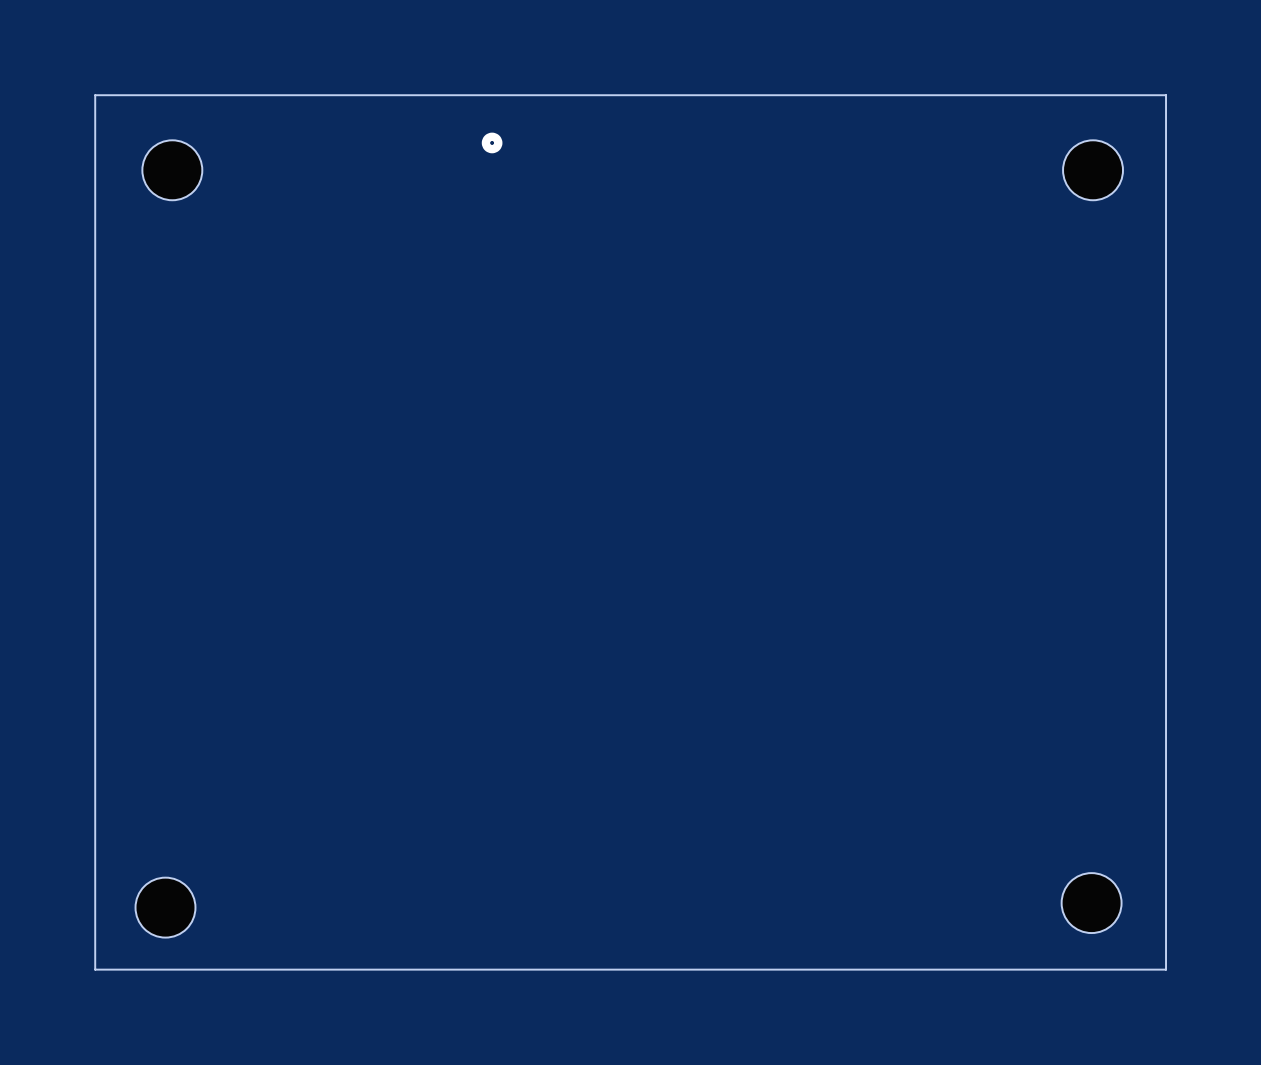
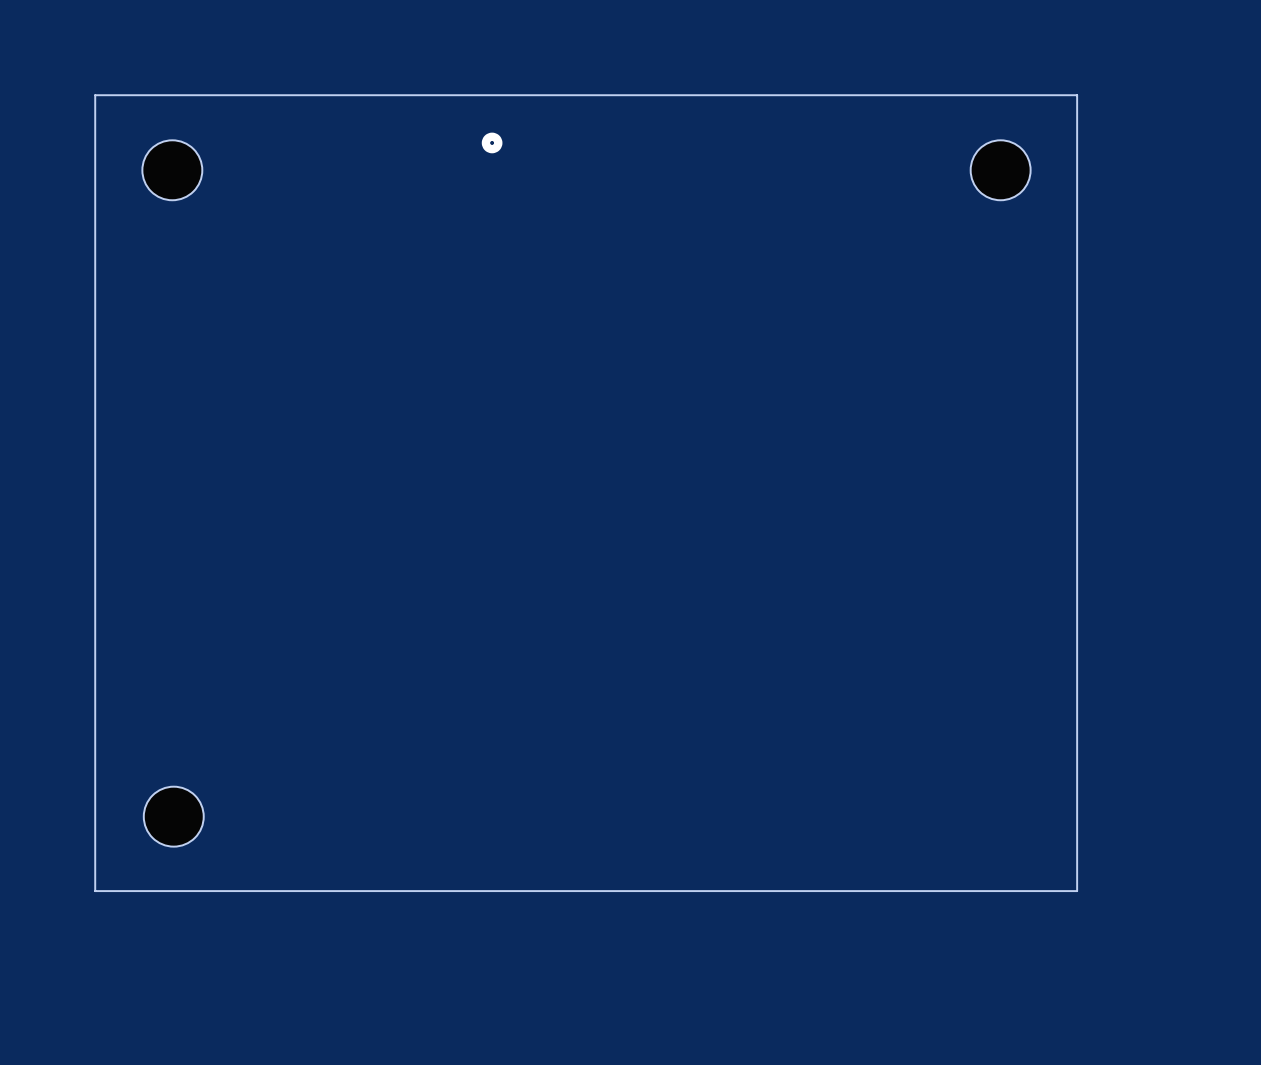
board edge: (1077, 95) (1166, 95) (1166, 969) (95, 969) (95, 891) -> (1077, 95) (1077, 891) (95, 891)
part position: (1093, 170) -> (1000, 170)
part: (1091, 903) -> none
part position: (165, 907) -> (173, 816)

